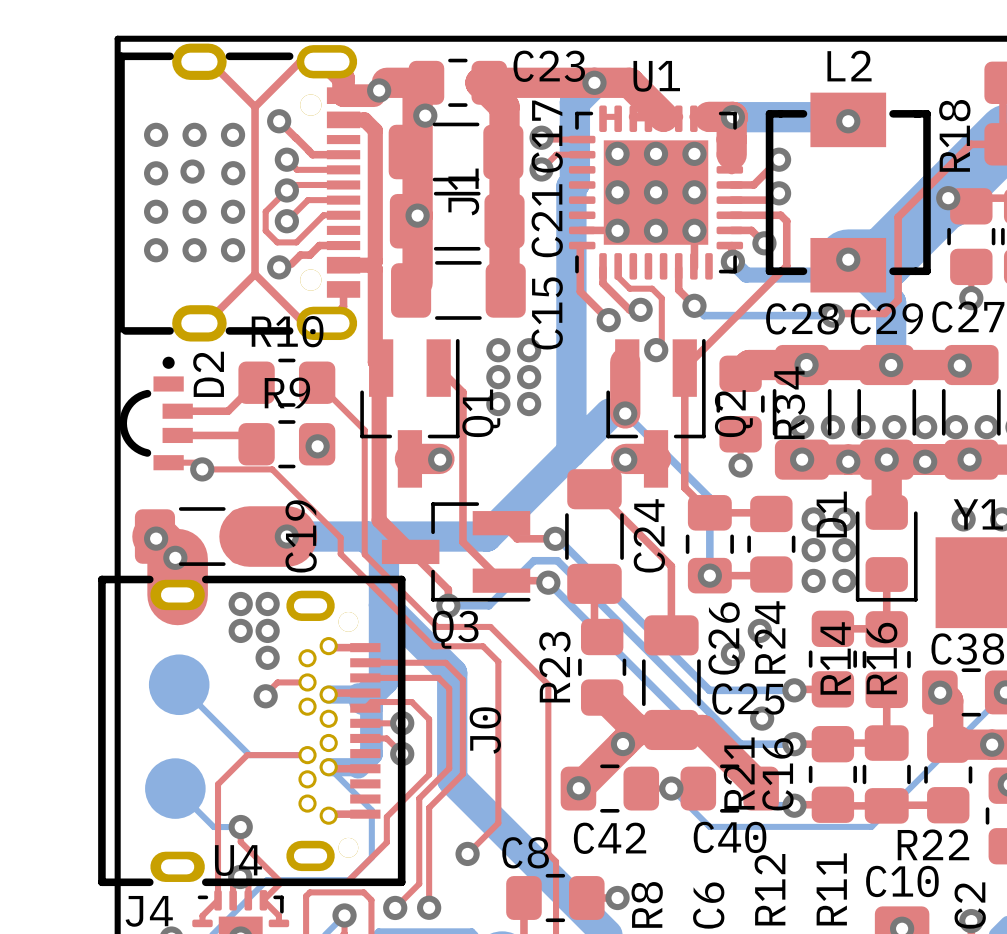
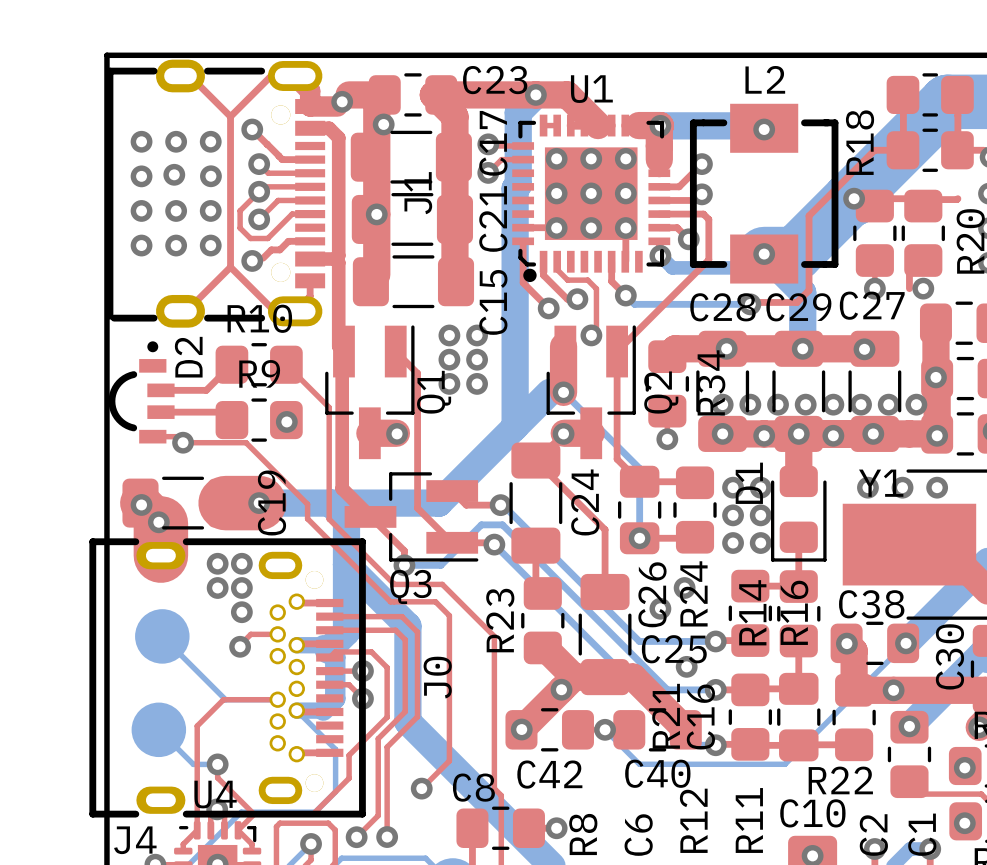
U1 footprint: [568, 105, 744, 280] -> [512, 114, 671, 283]

